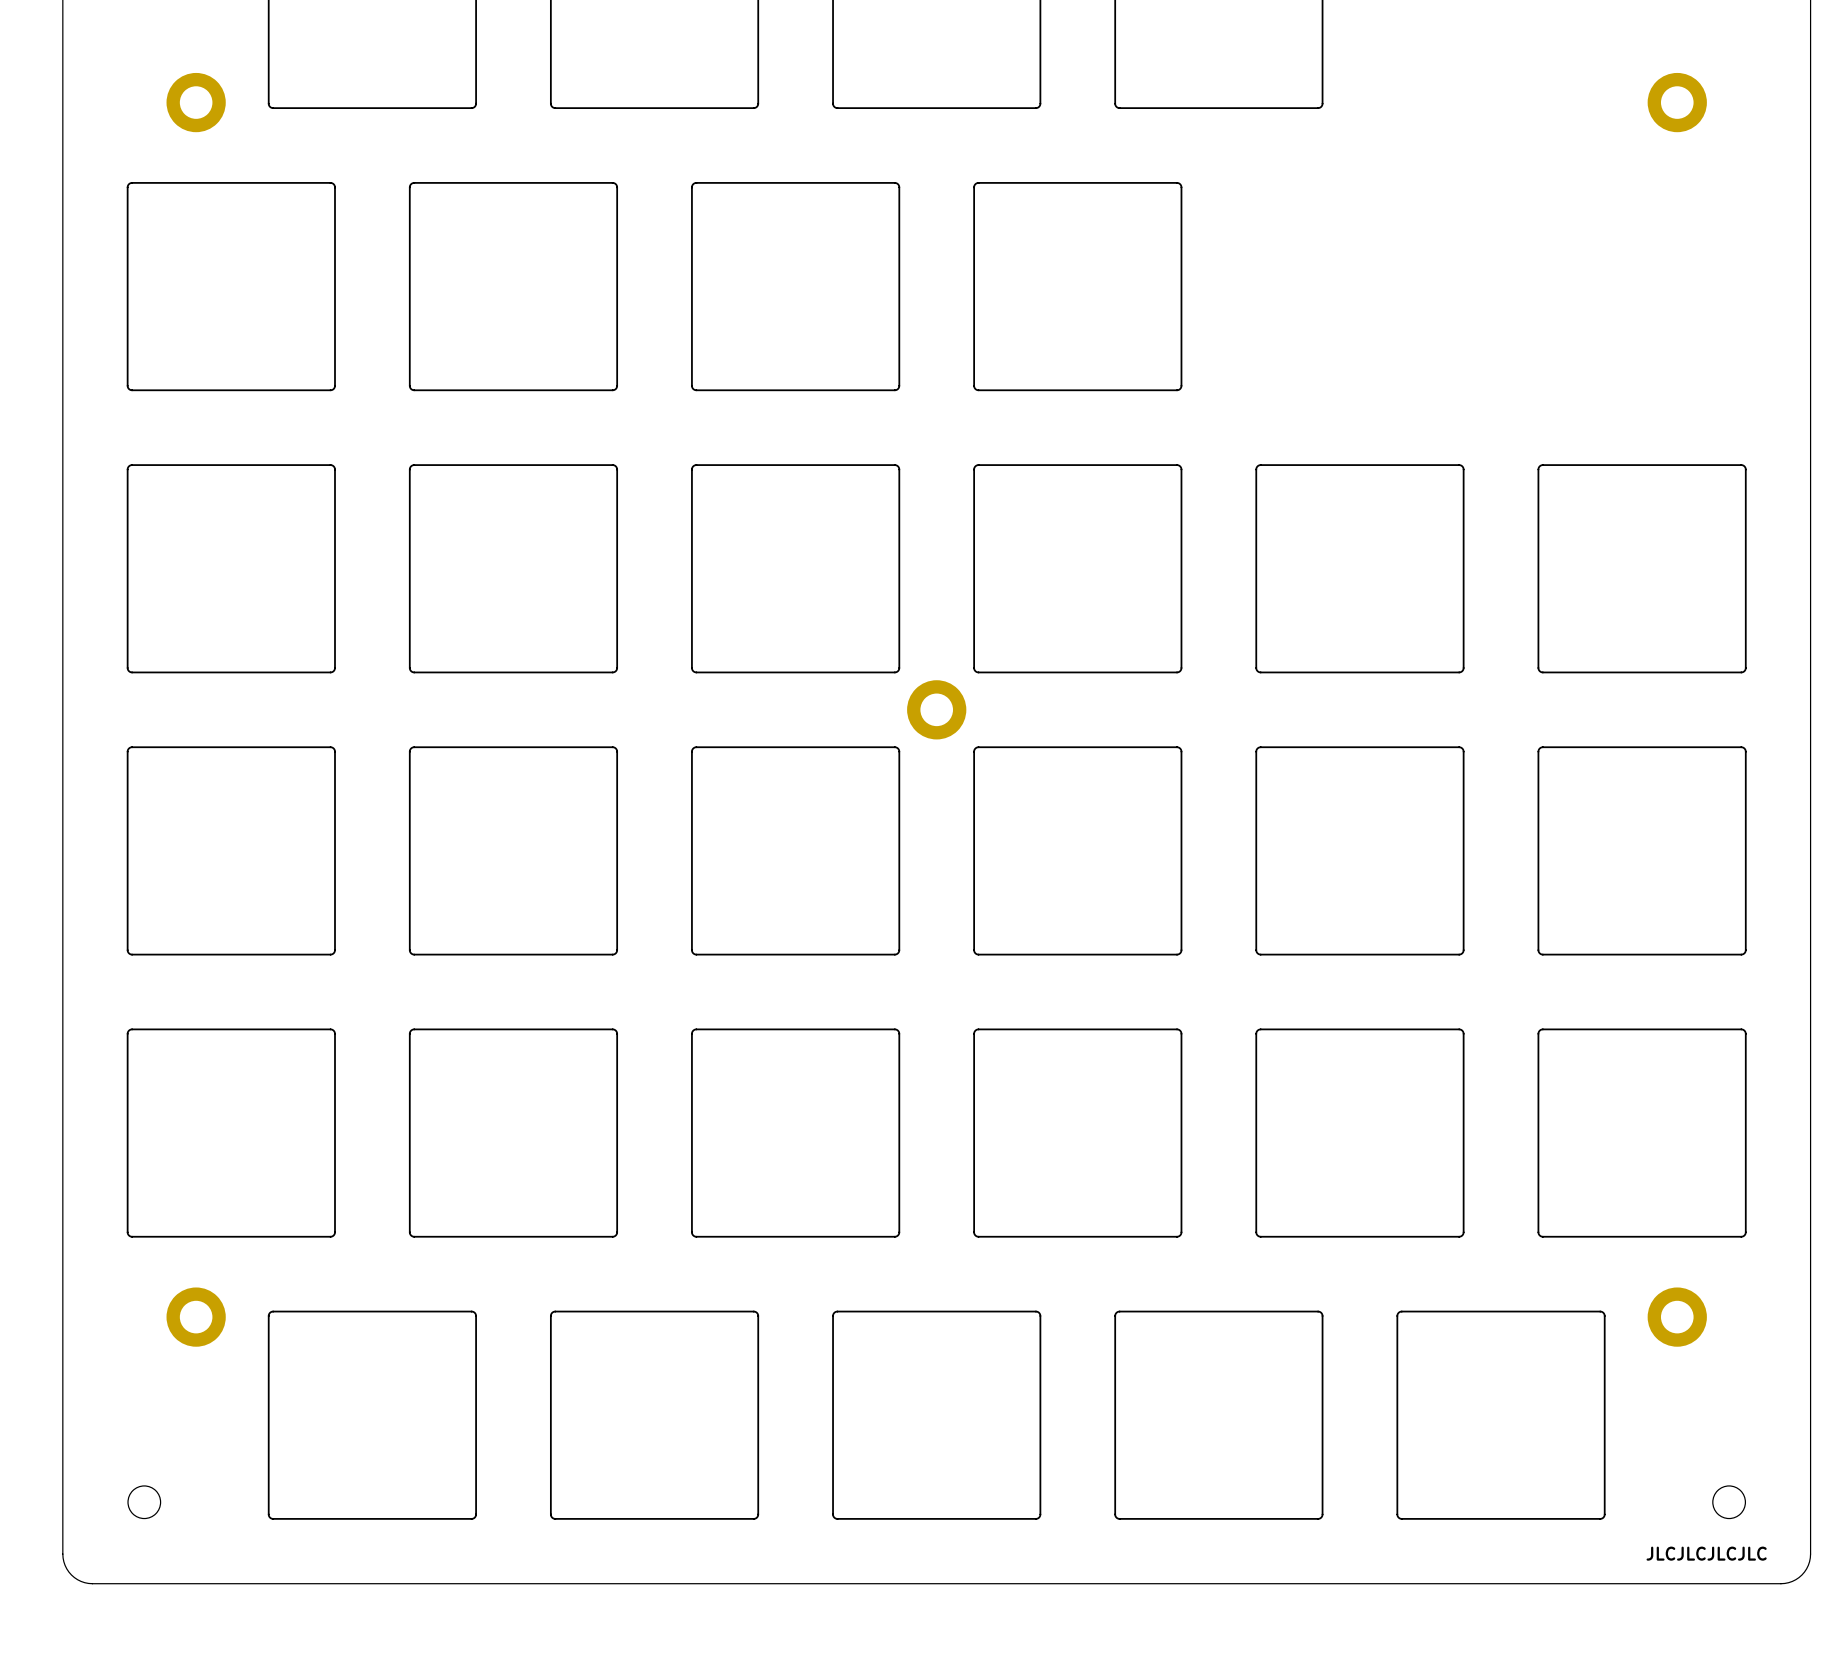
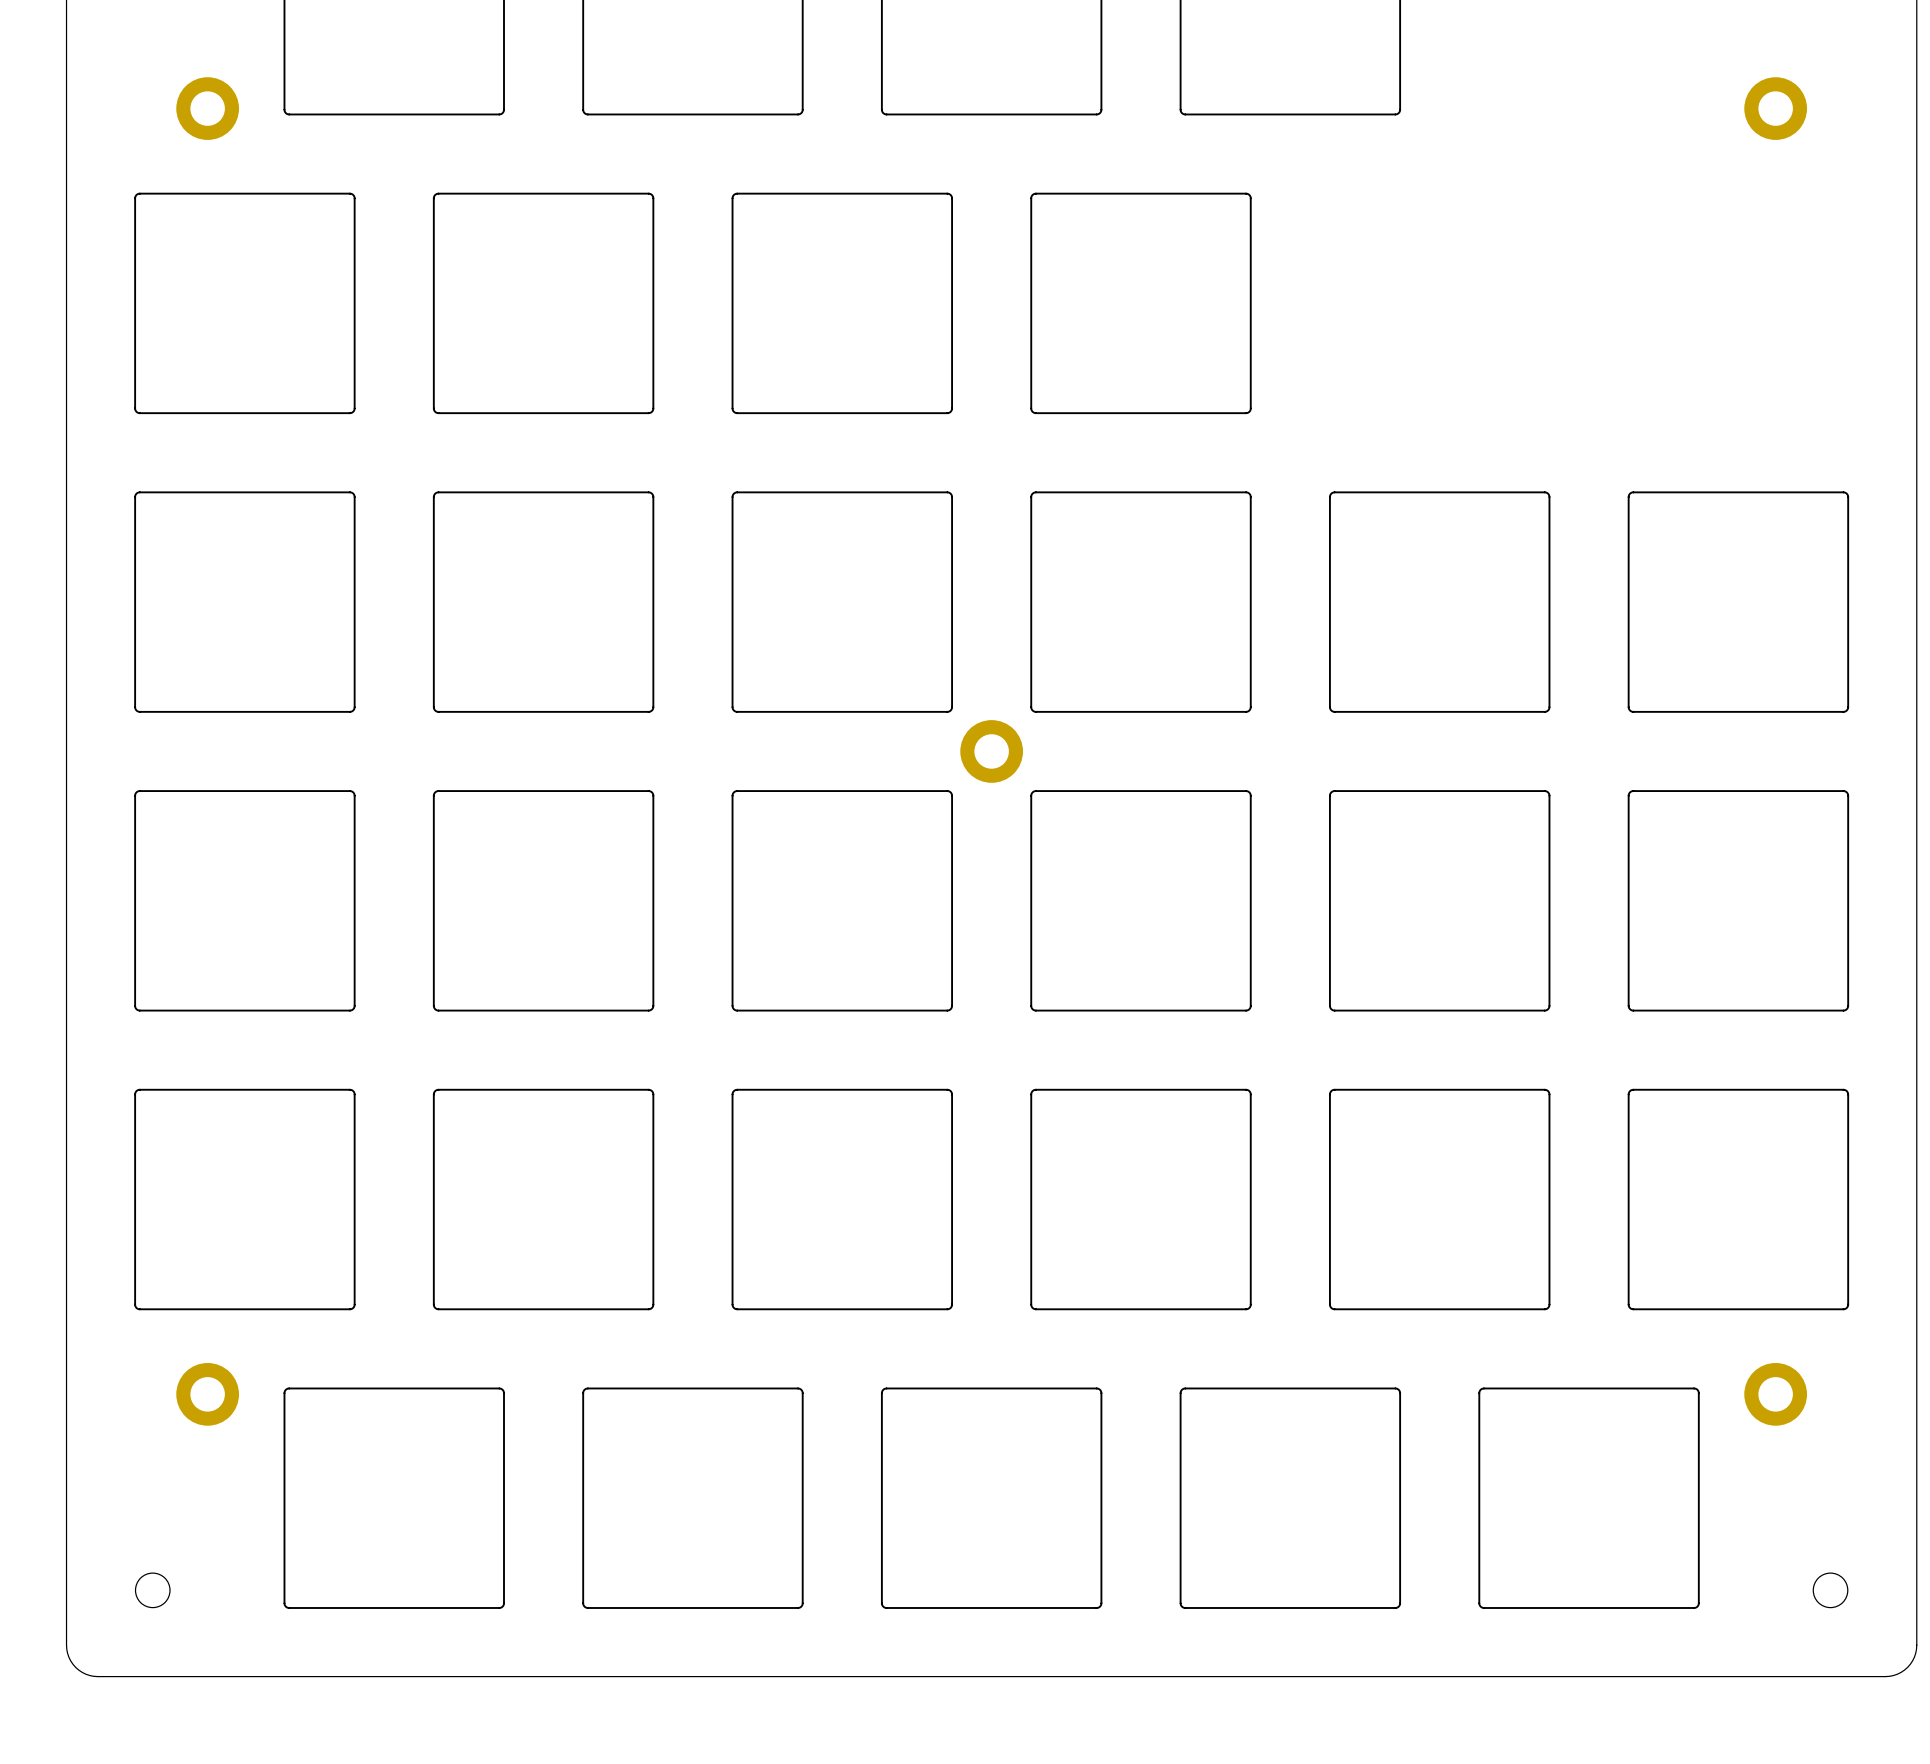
text: JLCJLCJLCJLC (1706, 1553) -> none

